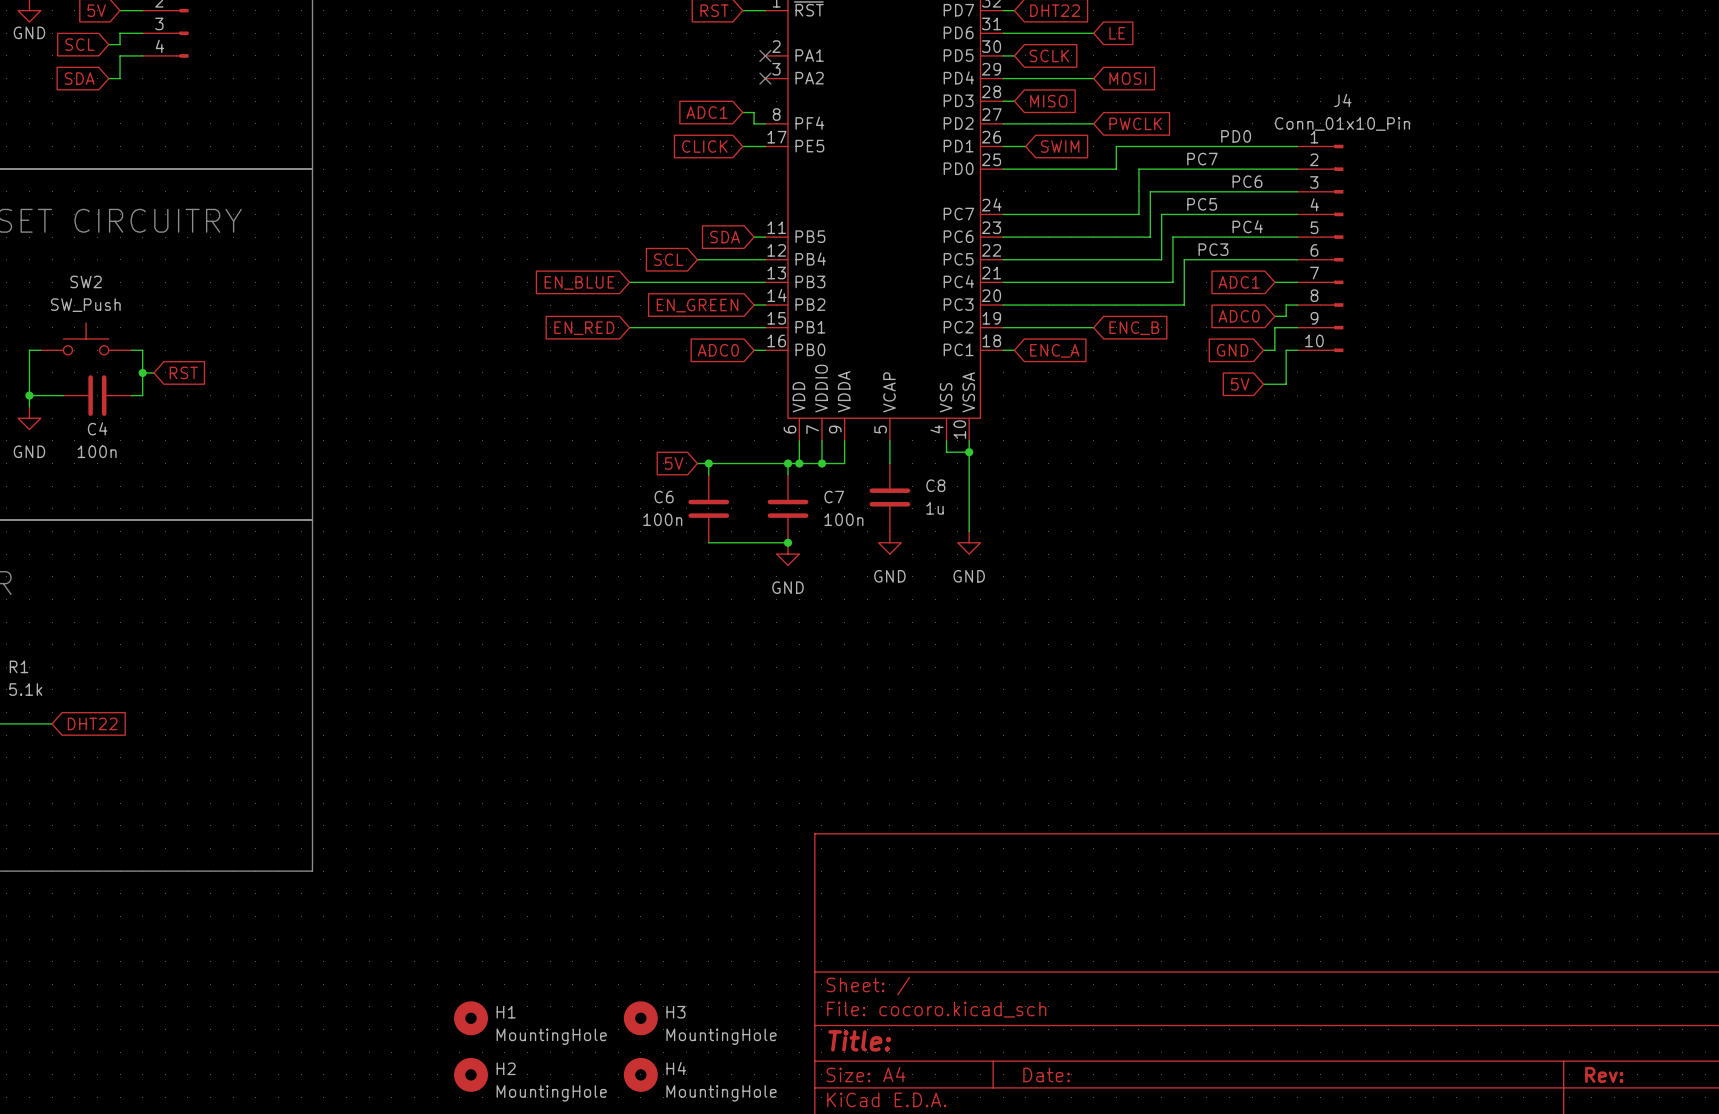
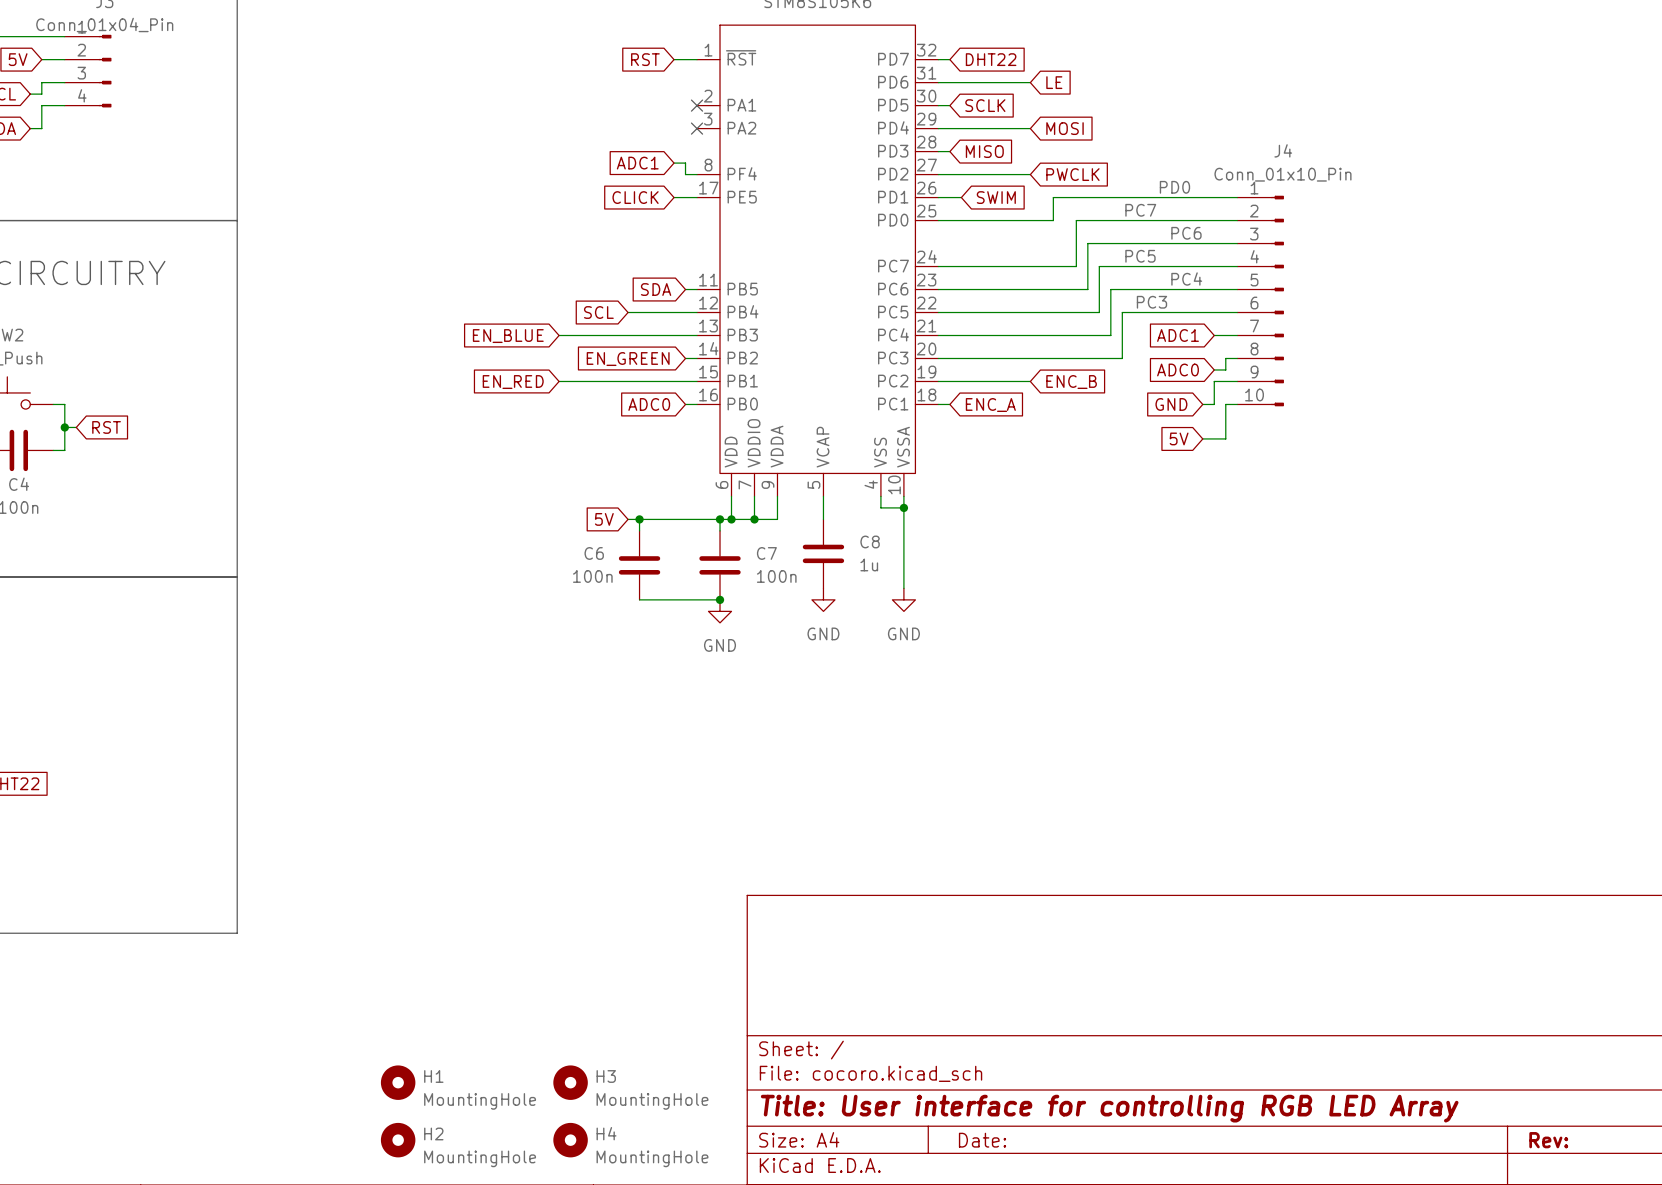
title block: Title: (859, 1040) -> Title: User interface for controlling RGB LED Array (1109, 1108)

